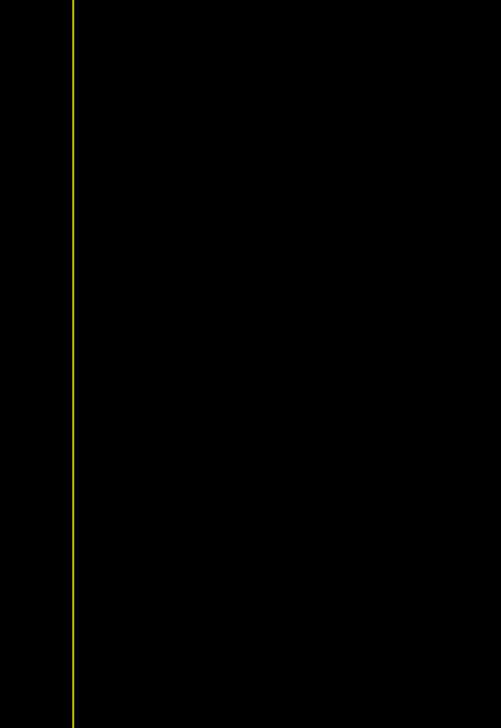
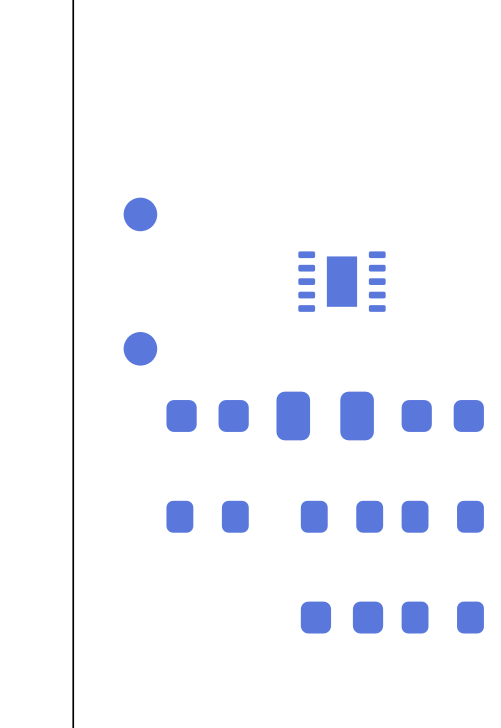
part: none -> (140, 214)
part: none -> (341, 281)
part: none -> (140, 348)
part: none -> (207, 415)
part: none -> (325, 415)
part: none -> (442, 415)
part: none -> (207, 516)
part: none -> (341, 516)
part: none -> (442, 516)
part: none -> (341, 617)
part: none -> (442, 617)

